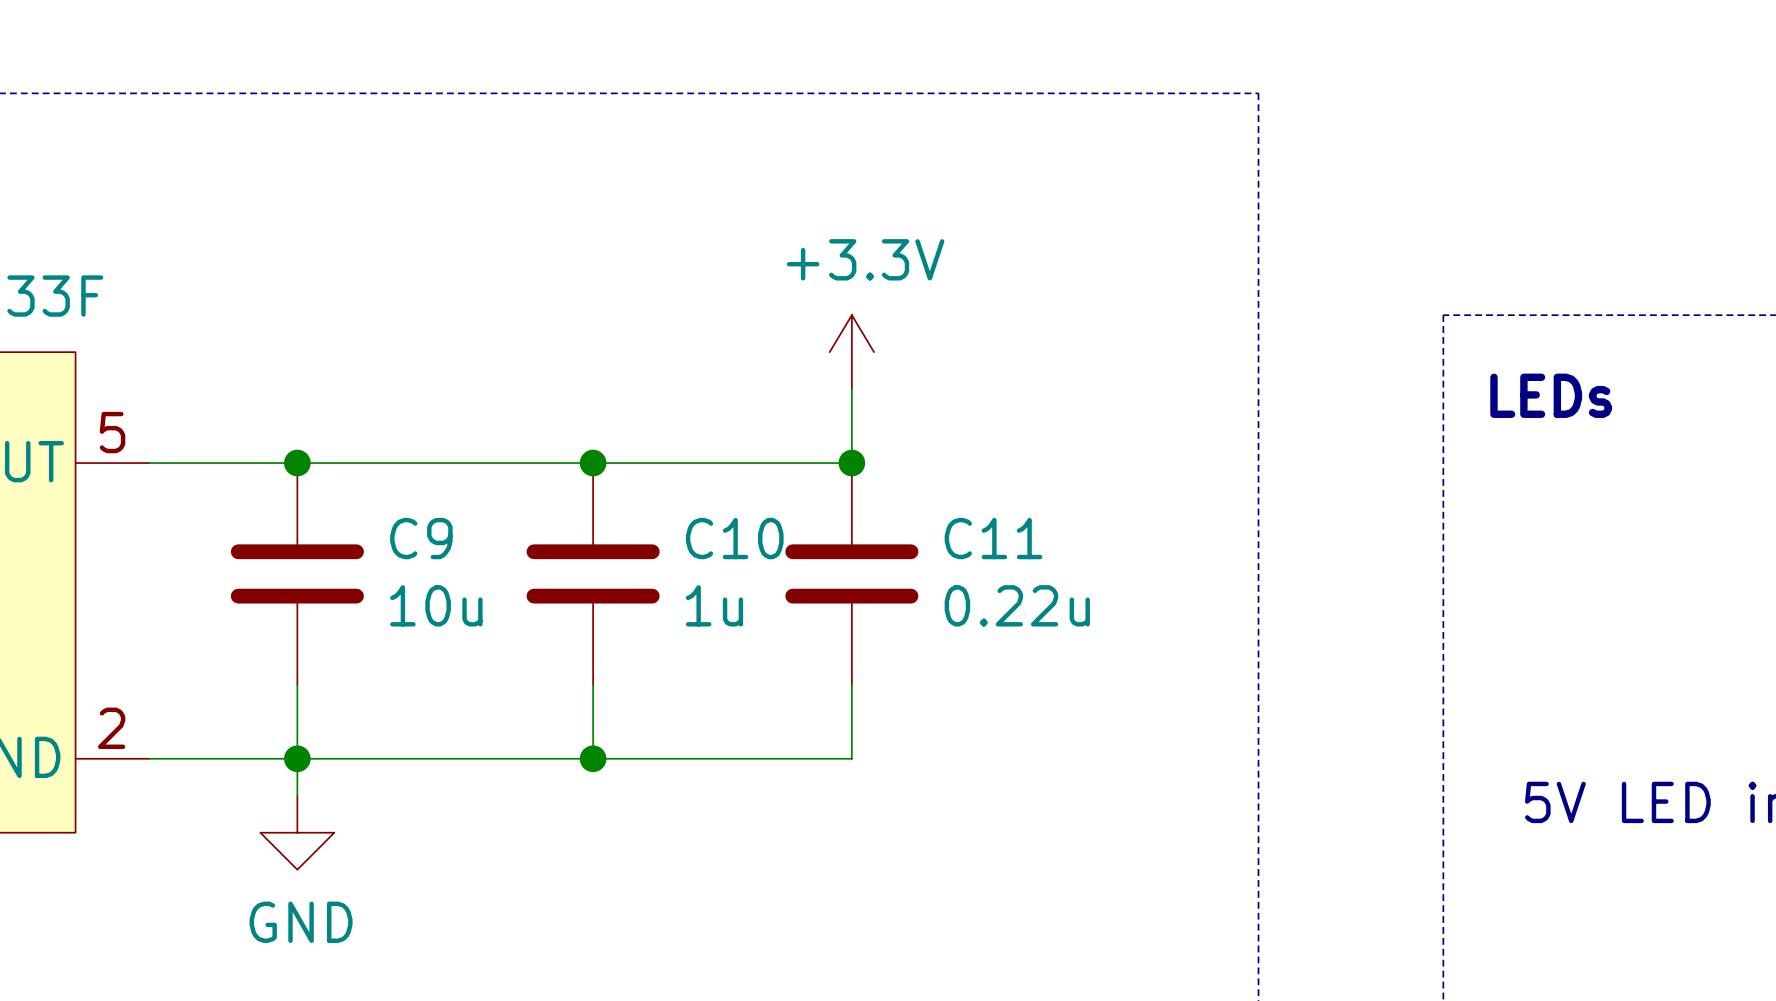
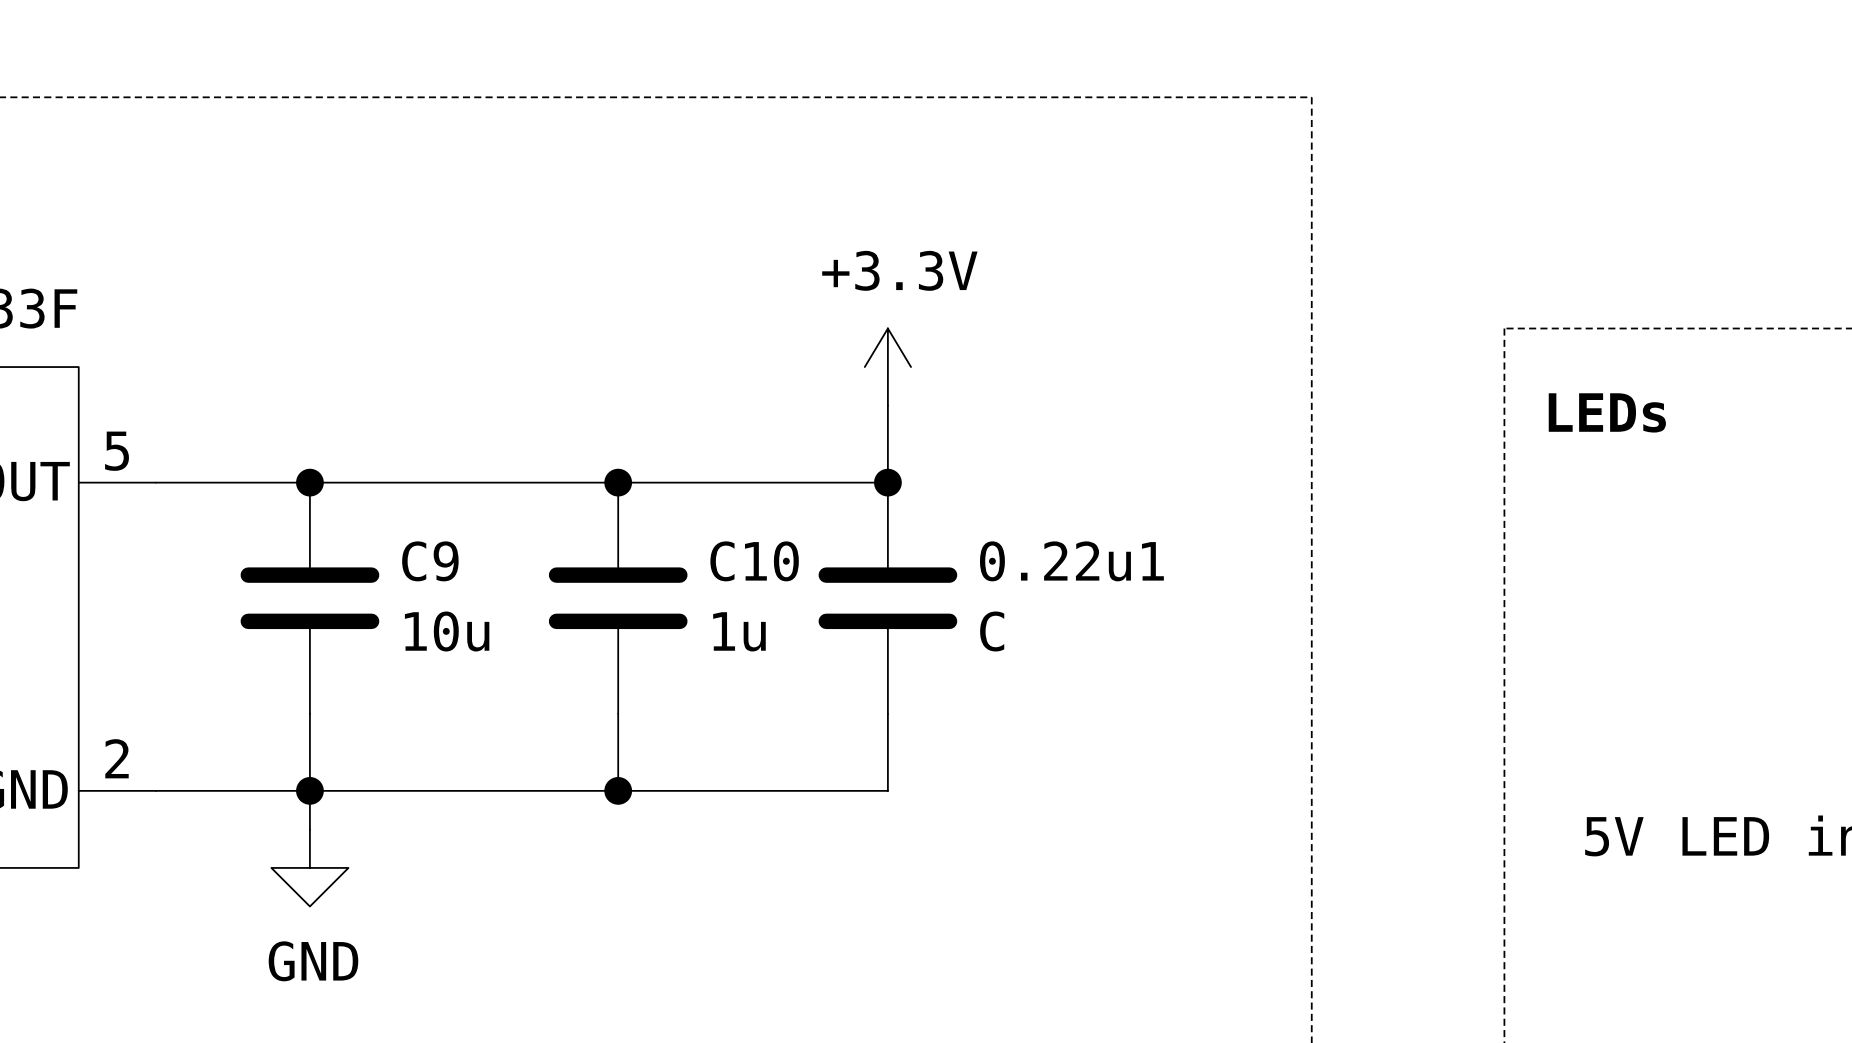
C11 name: C11 (993, 538) -> 0.22u1 (1071, 561)
C11 value: 0.22u (1017, 605) -> C (992, 631)

